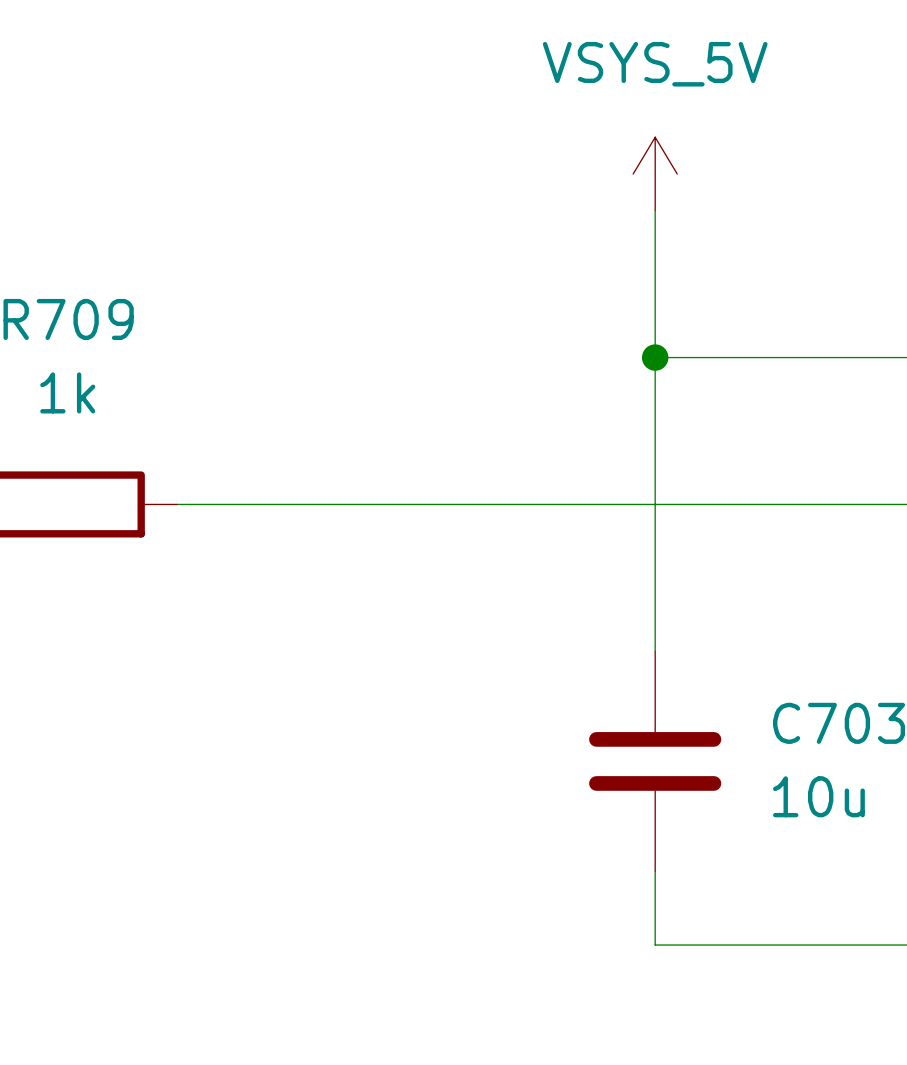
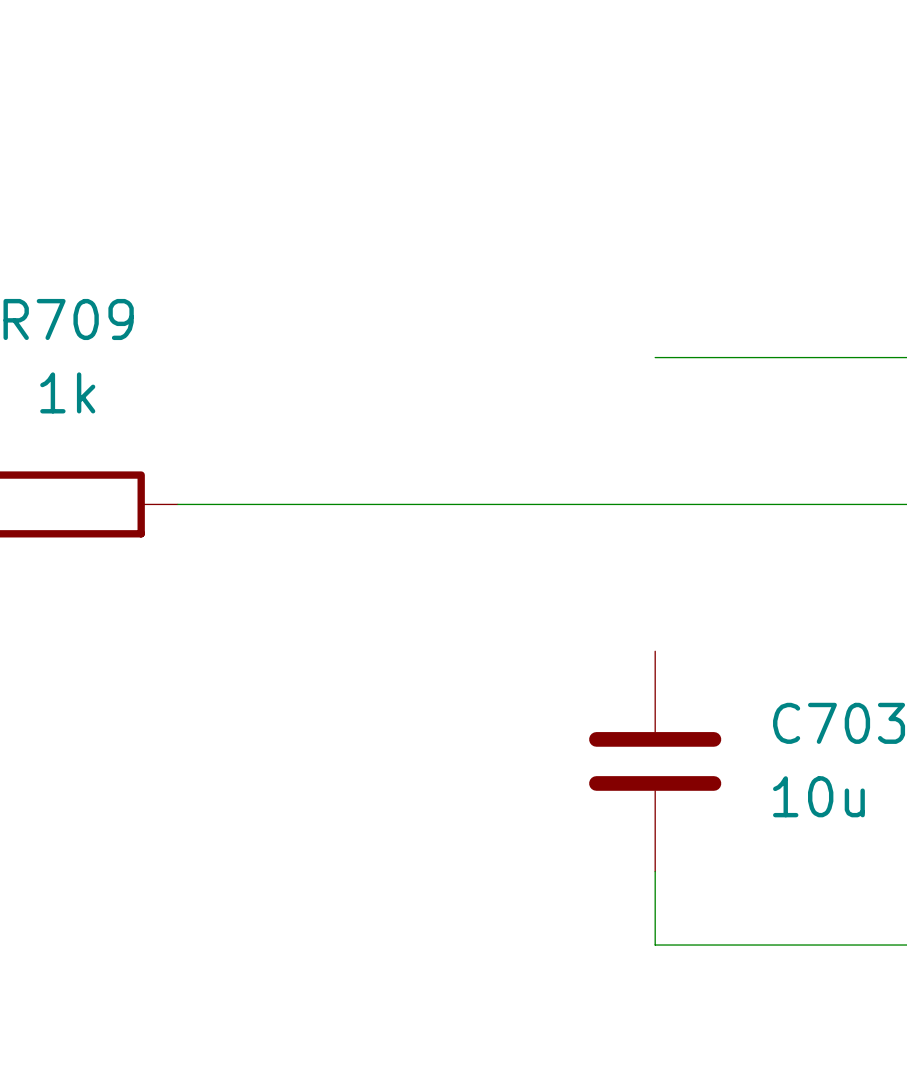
power symbol: VSYS_5V (655, 174) -> none
wire: (655, 210) (655, 651) -> none
junction: (655, 357) -> none

